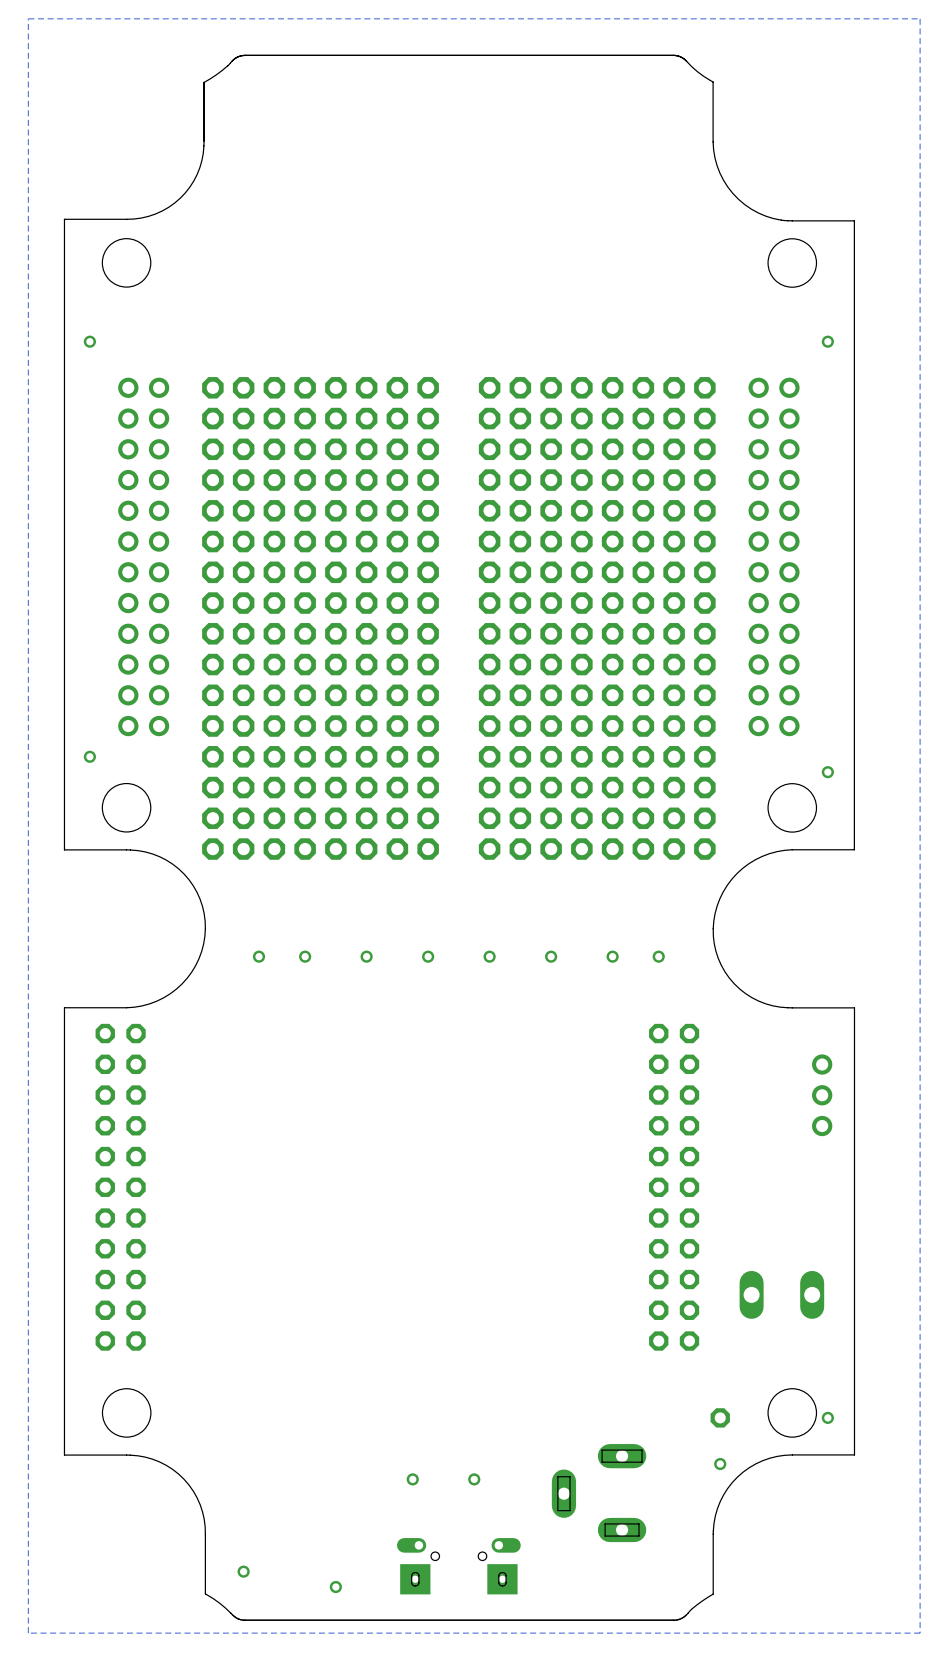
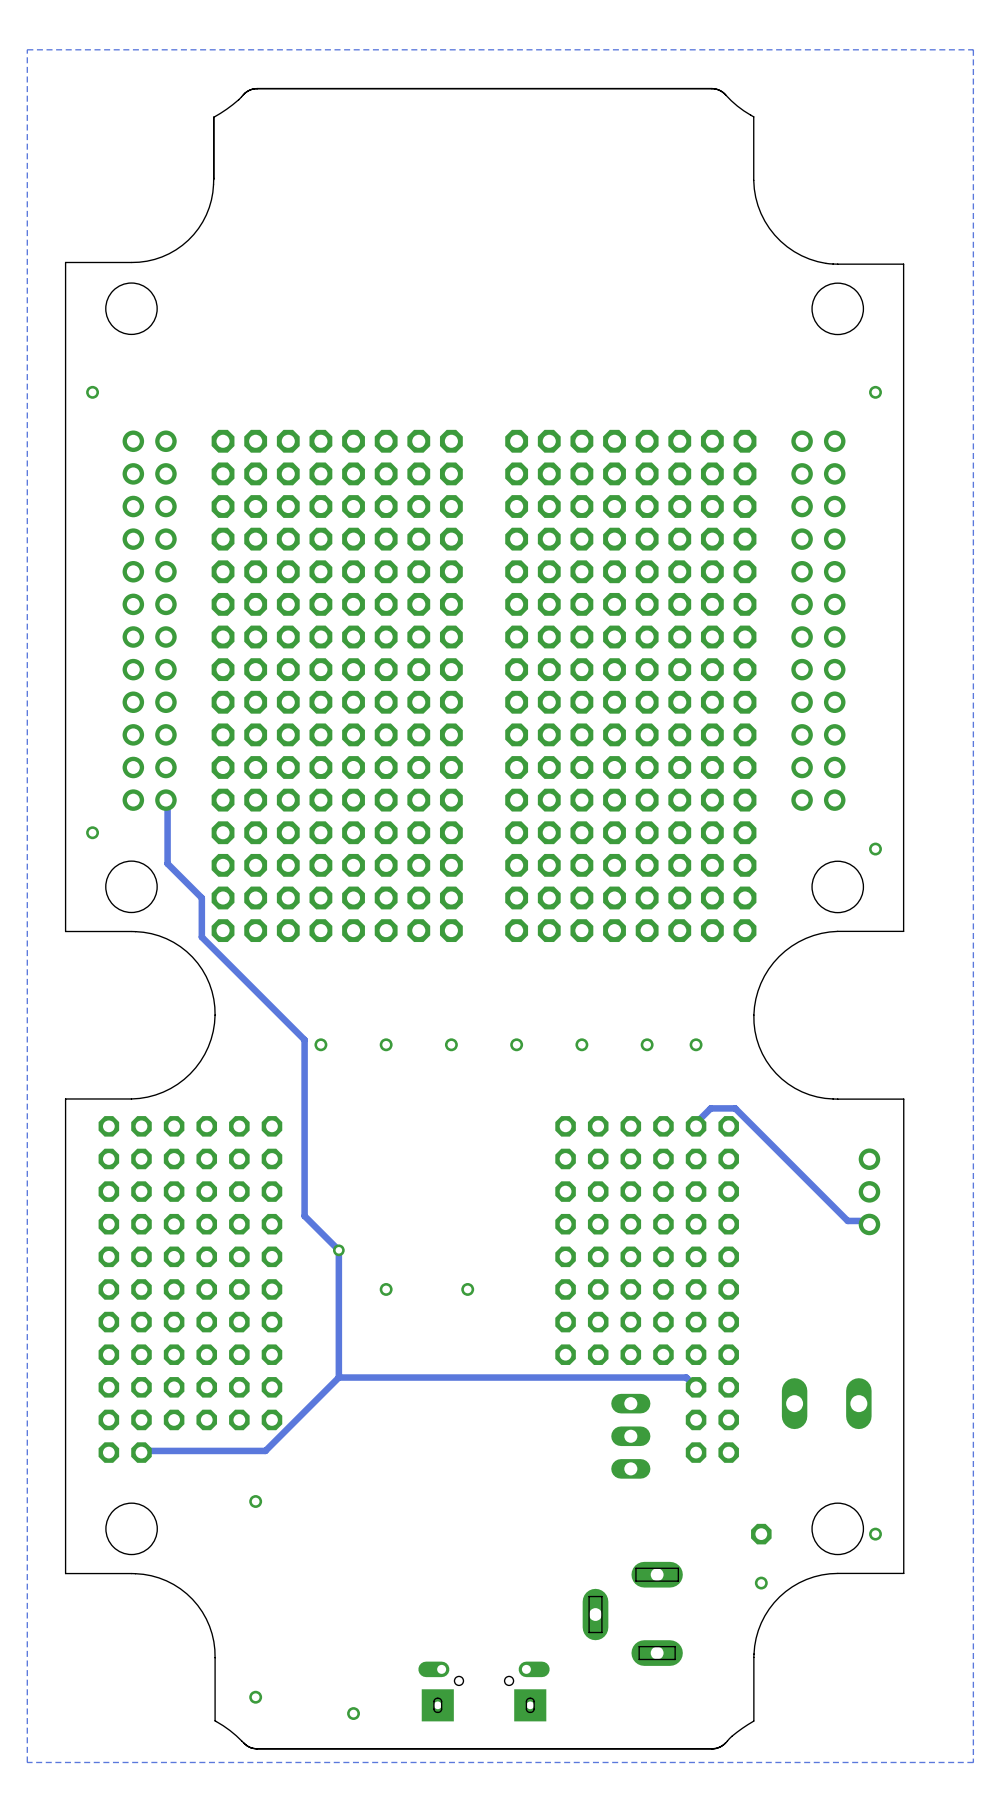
track: none -> (165, 800) (167, 800) (167, 863) (201, 897) (201, 937) (304, 1039) (304, 1216) (338, 1250) (338, 1377)
via: (259, 956) -> none
part: none -> (174, 1126)
part: none -> (206, 1126)
part: none -> (239, 1126)
part: none -> (271, 1126)
part: none -> (565, 1126)
part: none -> (598, 1126)
part: none -> (630, 1126)
part: none -> (663, 1126)
track: none -> (696, 1126) (696, 1123) (710, 1108) (735, 1108) (847, 1220) (867, 1220) (869, 1224)
part: none -> (174, 1158)
part: none -> (206, 1158)
part: none -> (239, 1158)
part: none -> (271, 1158)
part: none -> (565, 1158)
part: none -> (598, 1158)
part: none -> (630, 1158)
part: none -> (663, 1158)
part: none -> (174, 1191)
part: none -> (206, 1191)
part: none -> (239, 1191)
part: none -> (271, 1191)
part: none -> (565, 1191)
part: none -> (598, 1191)
part: none -> (630, 1191)
part: none -> (663, 1191)
part: none -> (174, 1224)
part: none -> (206, 1224)
part: none -> (239, 1224)
part: none -> (271, 1224)
part: none -> (565, 1224)
part: none -> (598, 1224)
part: none -> (630, 1224)
part: none -> (663, 1224)
via: none -> (338, 1250)
part: none -> (174, 1256)
part: none -> (206, 1256)
part: none -> (239, 1256)
part: none -> (271, 1256)
part: none -> (565, 1256)
part: none -> (598, 1256)
part: none -> (630, 1256)
part: none -> (663, 1256)
part: none -> (174, 1289)
part: none -> (206, 1289)
part: none -> (239, 1289)
part: none -> (271, 1289)
via: none -> (386, 1289)
via: none -> (467, 1289)
part: none -> (565, 1289)
part: none -> (598, 1289)
part: none -> (630, 1289)
part: none -> (663, 1289)
part: none -> (174, 1322)
part: none -> (206, 1322)
part: none -> (239, 1322)
part: none -> (271, 1322)
part: none -> (565, 1322)
part: none -> (598, 1322)
part: none -> (630, 1322)
part: none -> (663, 1322)
part: none -> (174, 1354)
part: none -> (206, 1354)
part: none -> (239, 1354)
part: none -> (271, 1354)
part: none -> (565, 1354)
part: none -> (598, 1354)
part: none -> (630, 1354)
part: none -> (663, 1354)
track: none -> (338, 1377) (265, 1450) (143, 1450) (141, 1452)
track: none -> (338, 1377) (686, 1377) (696, 1387)
part: none -> (174, 1387)
part: none -> (206, 1387)
part: none -> (239, 1387)
part: none -> (271, 1387)
part: none -> (174, 1419)
part: none -> (206, 1419)
part: none -> (239, 1419)
part: none -> (271, 1419)
part: none -> (630, 1436)
via: none -> (255, 1501)
via: (412, 1479) -> none
via: (474, 1479) -> none

